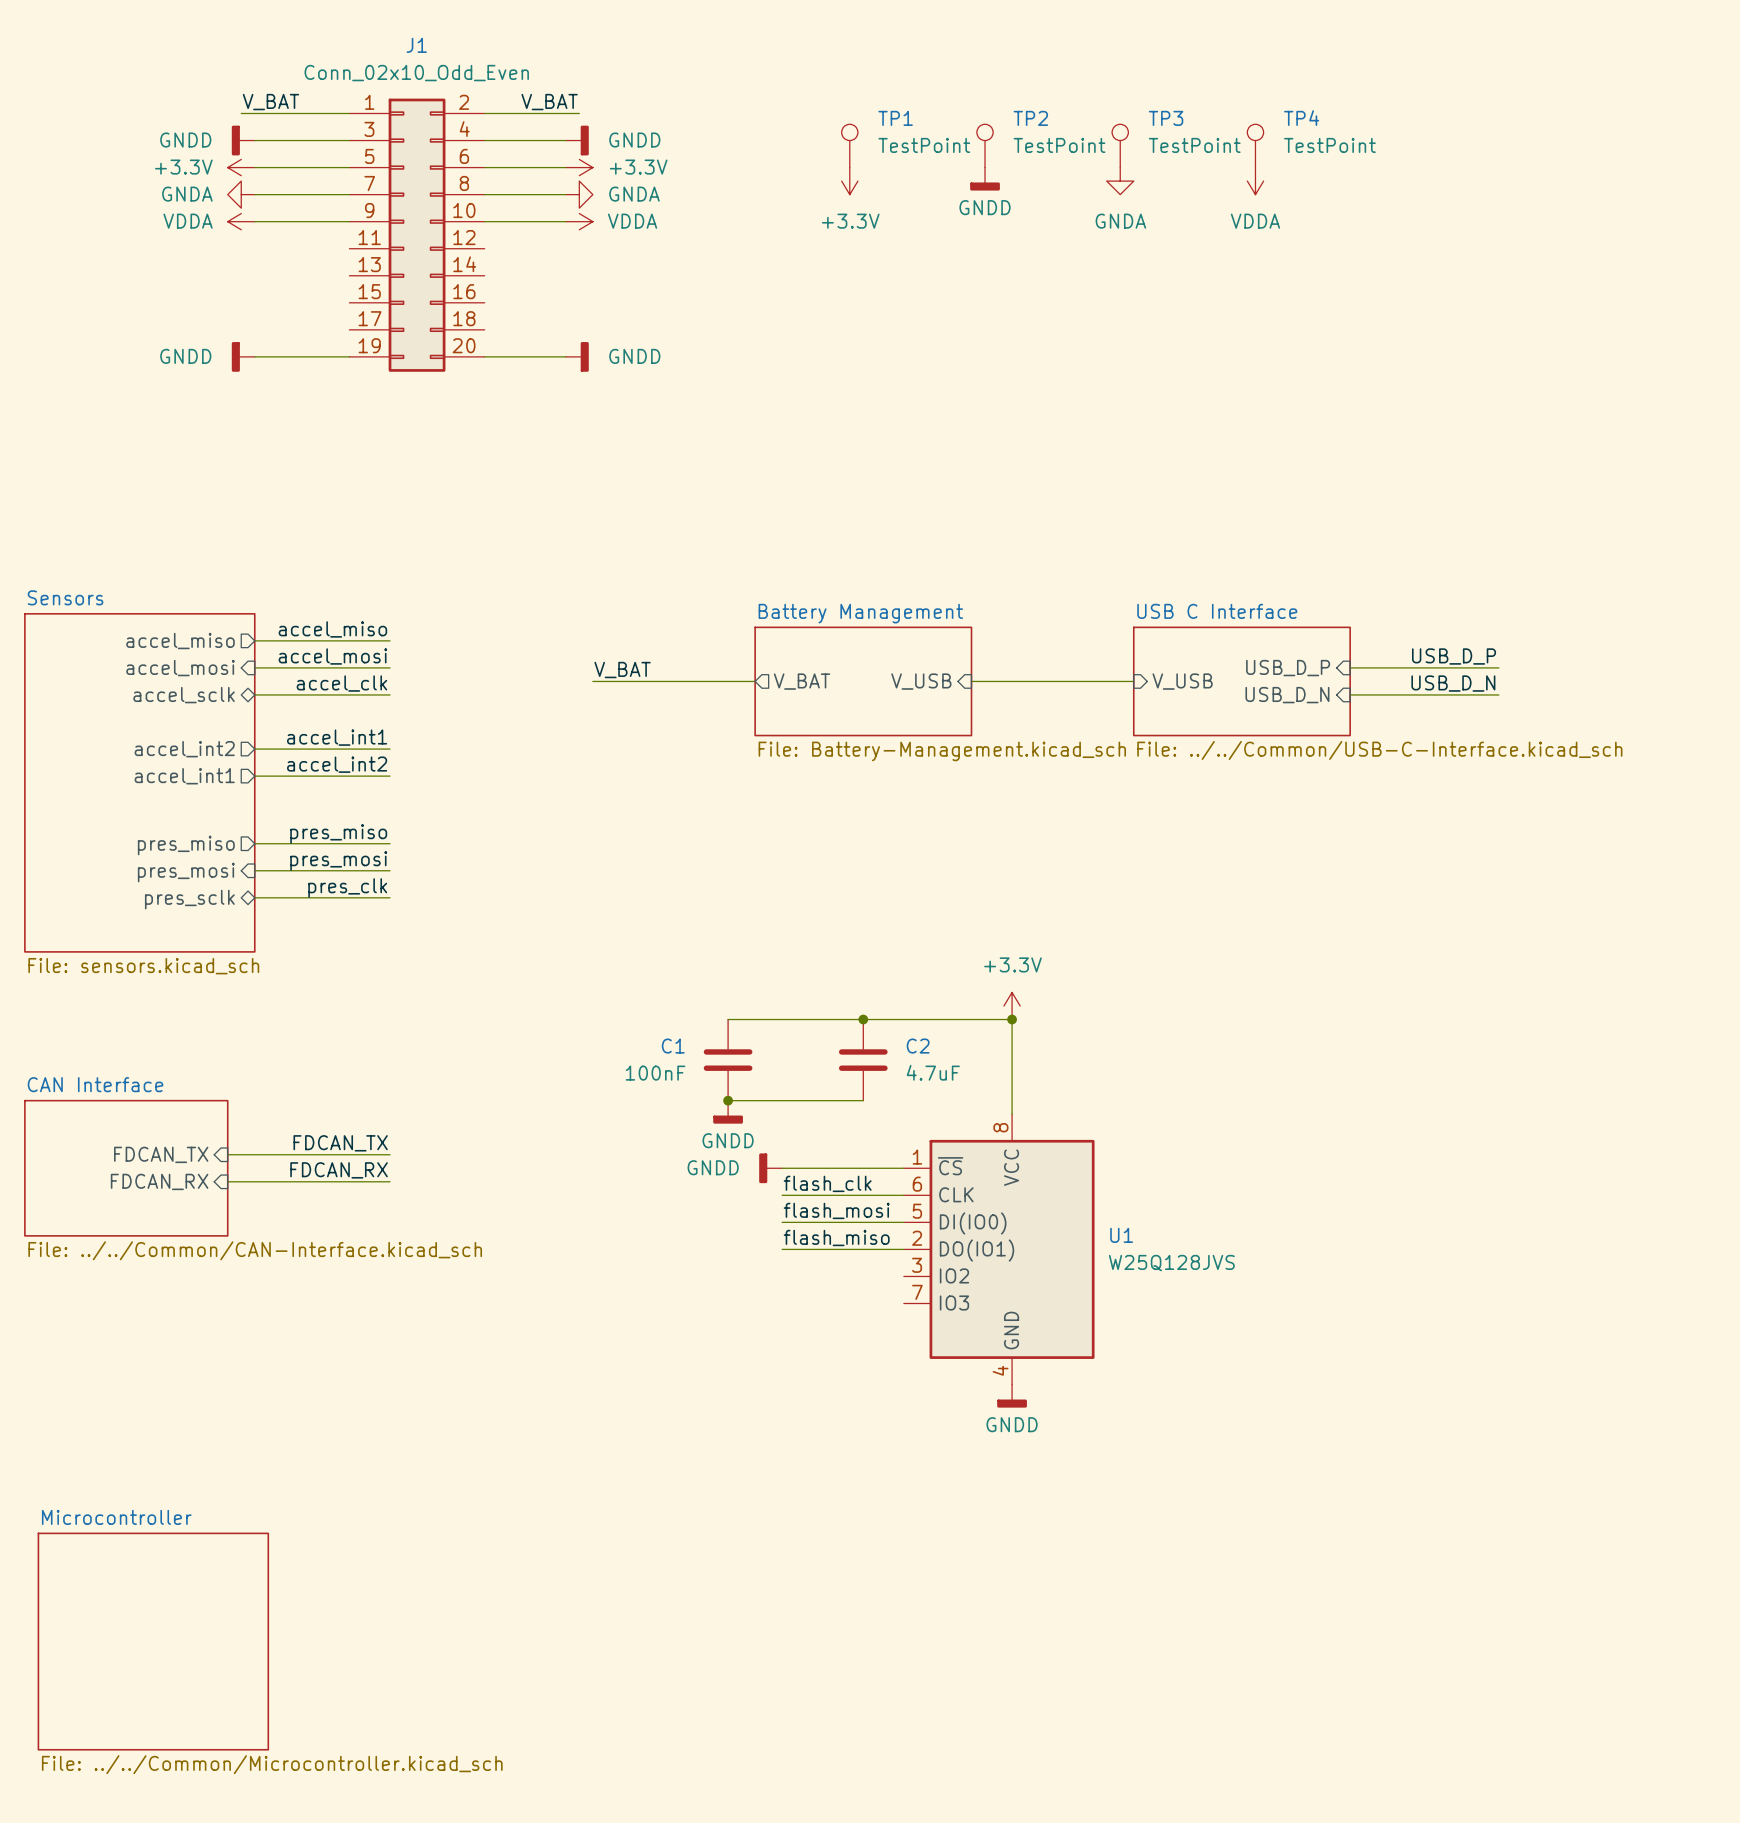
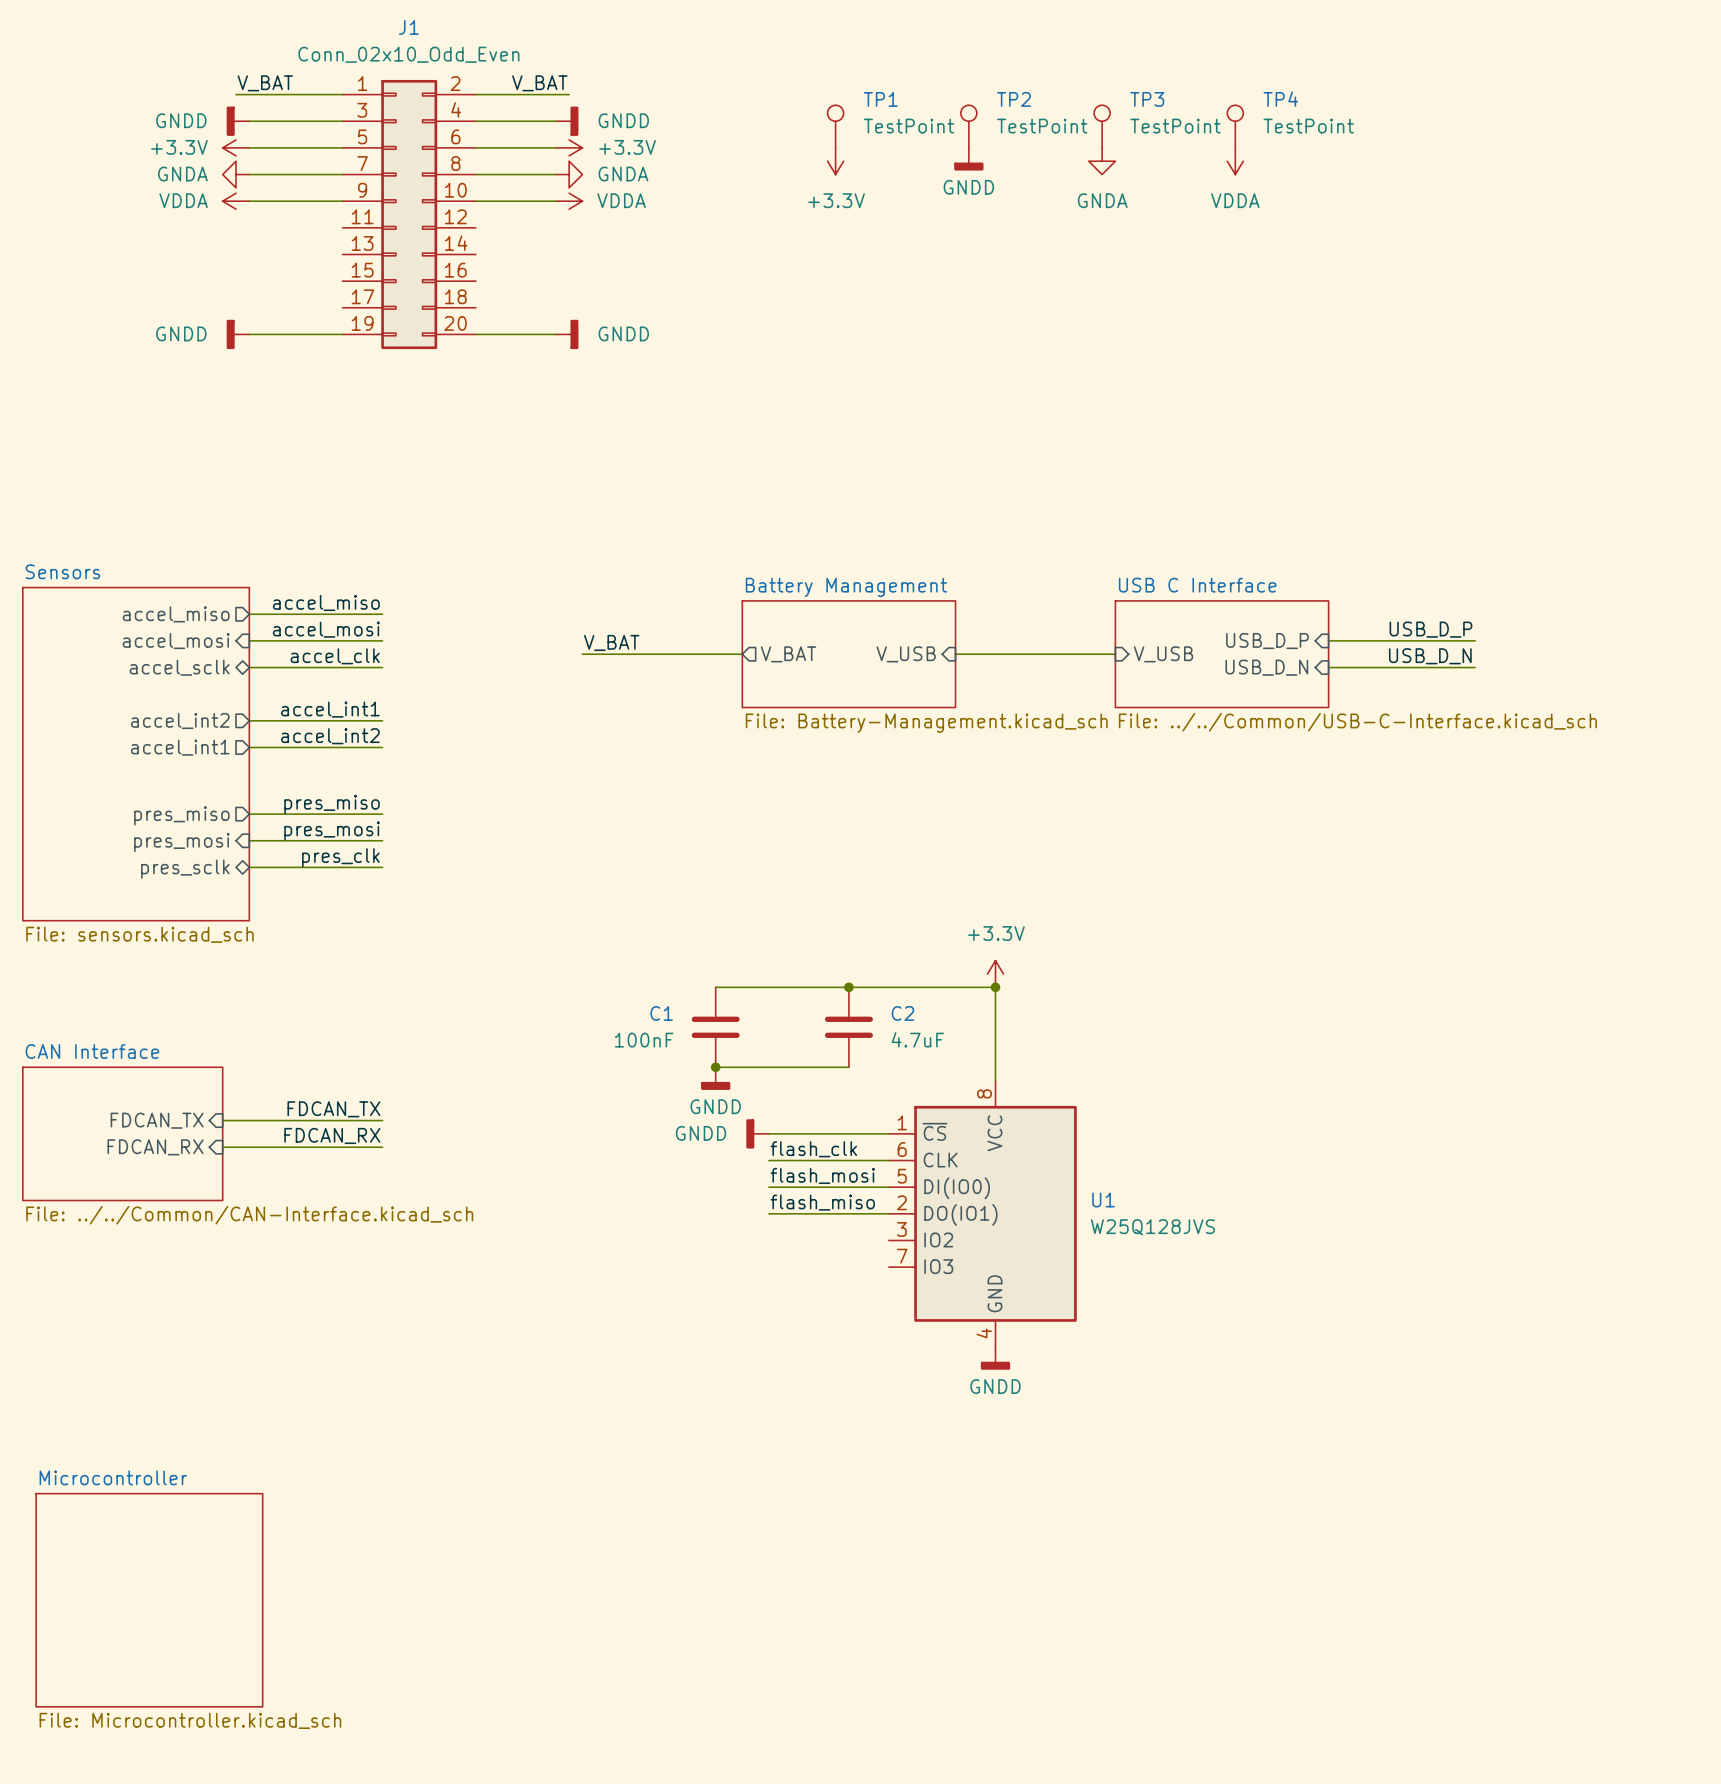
sheet Microcontroller value: File: ../../Common/Microcontroller.kicad_sch (272, 1764) -> File: Microcontroller.kicad_sch (190, 1720)

